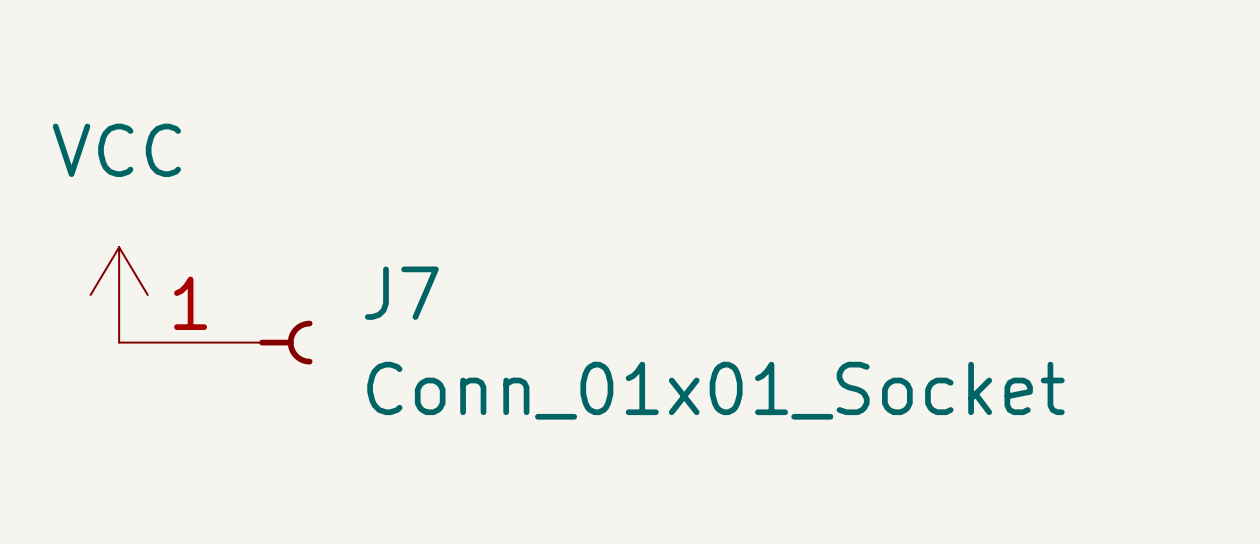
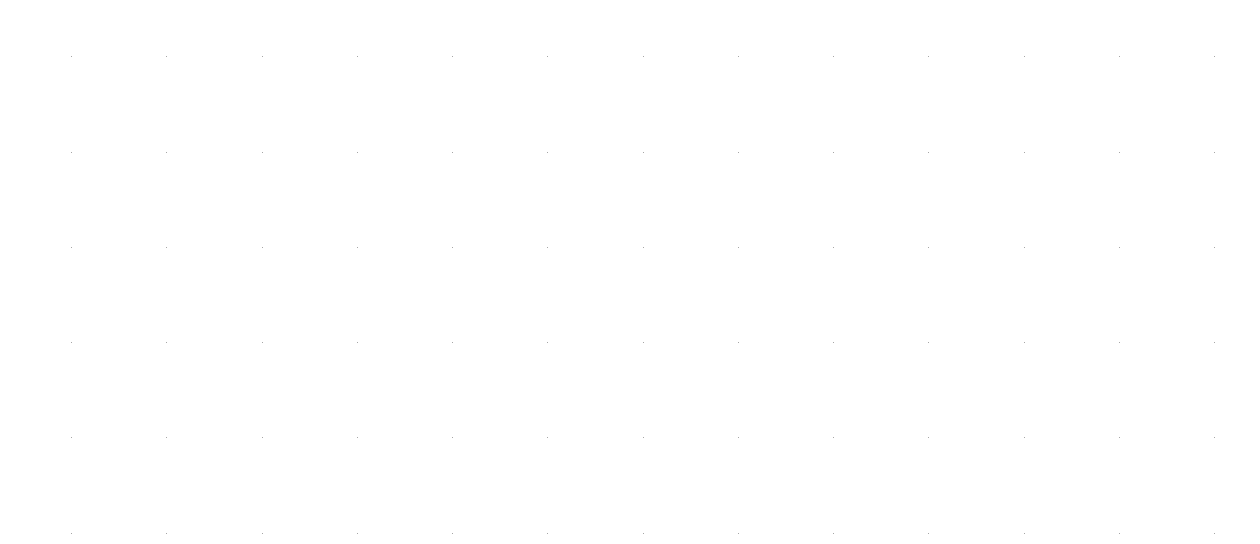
power symbol: VCC (119, 294) -> none
J7: Conn_01x01_Socket (215, 342) -> none

